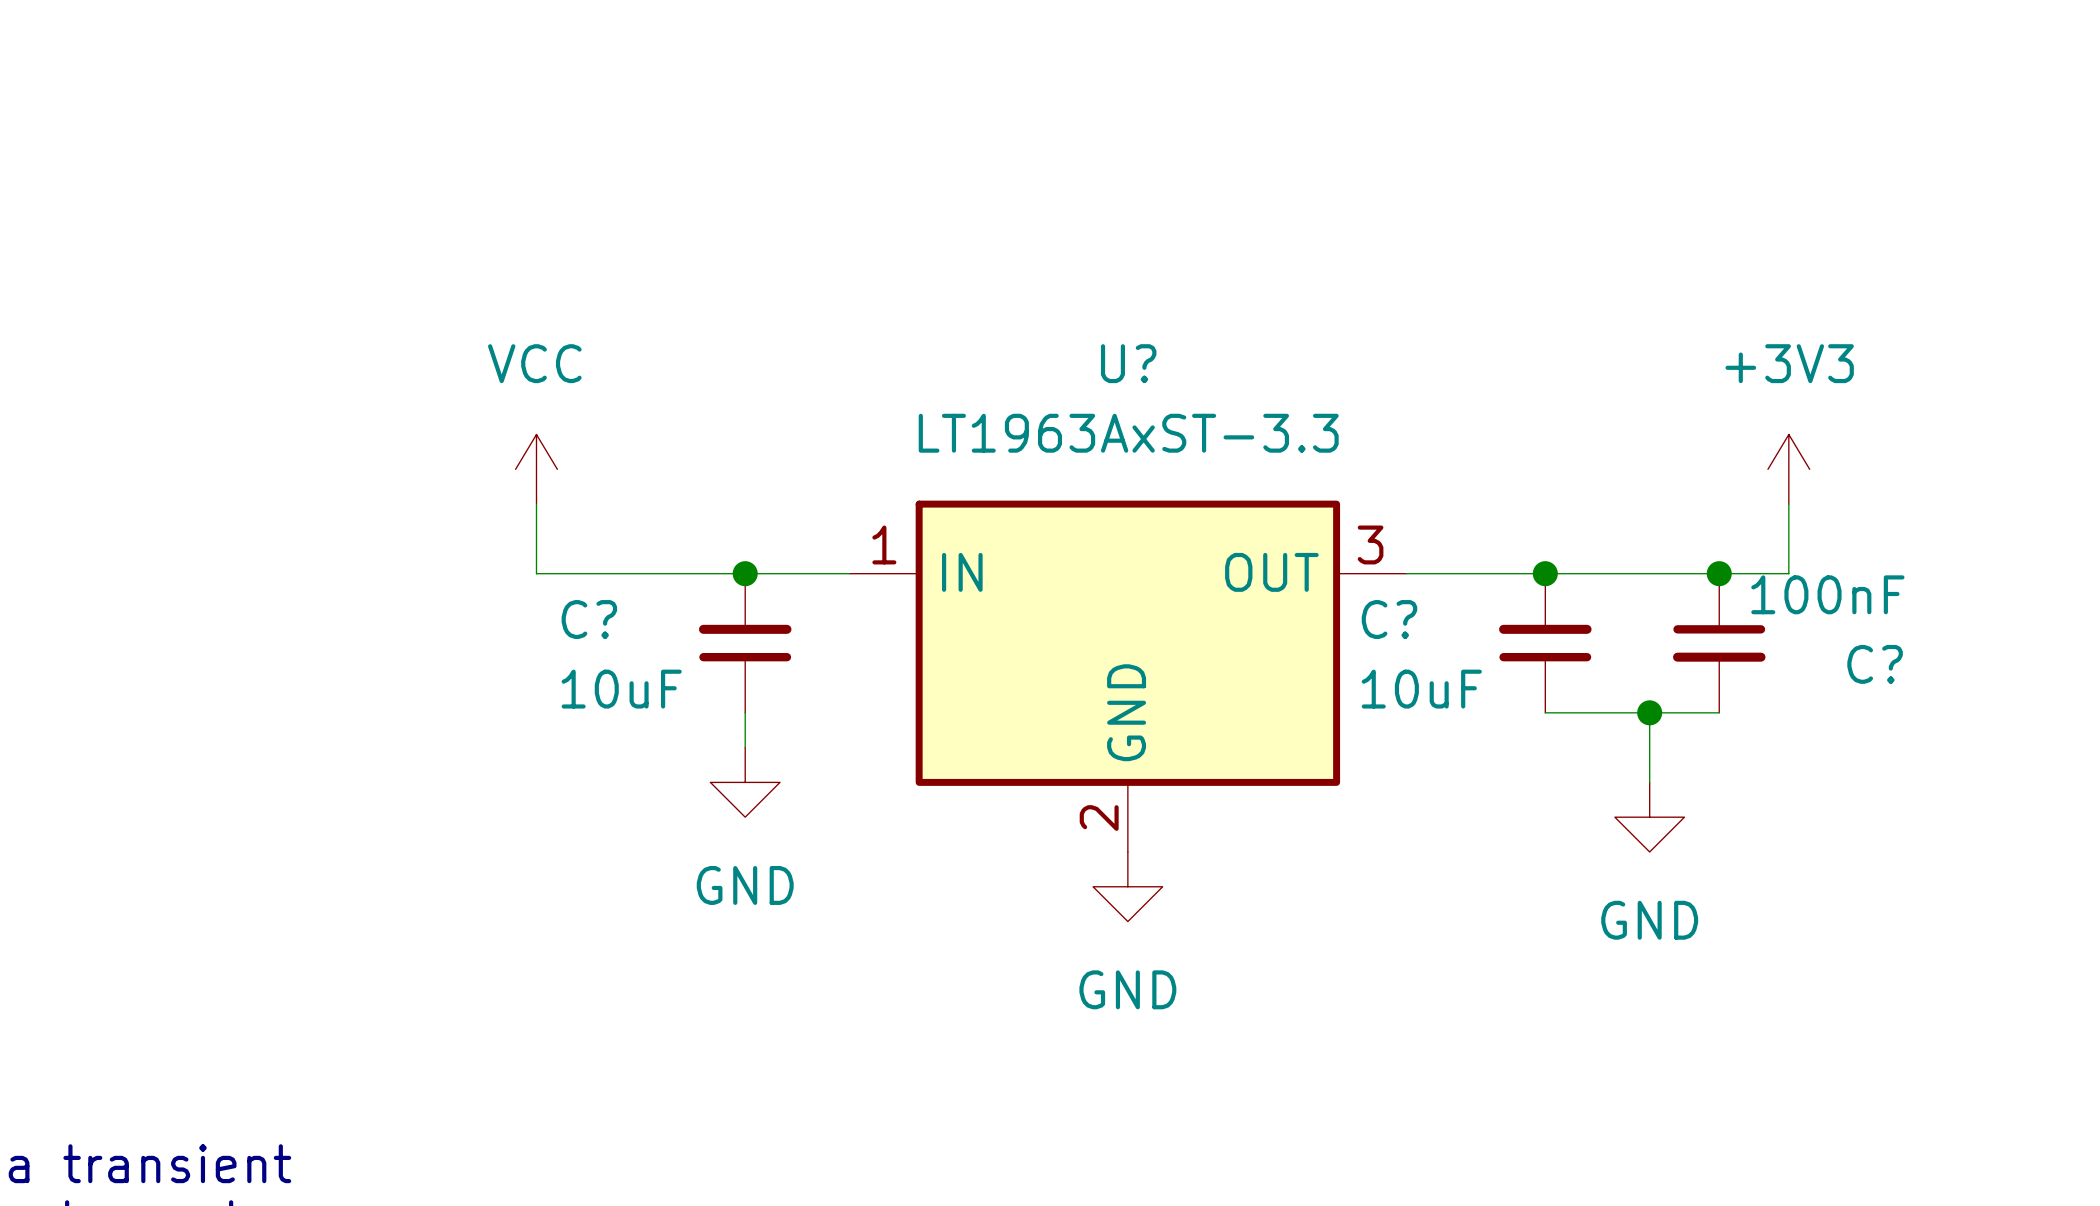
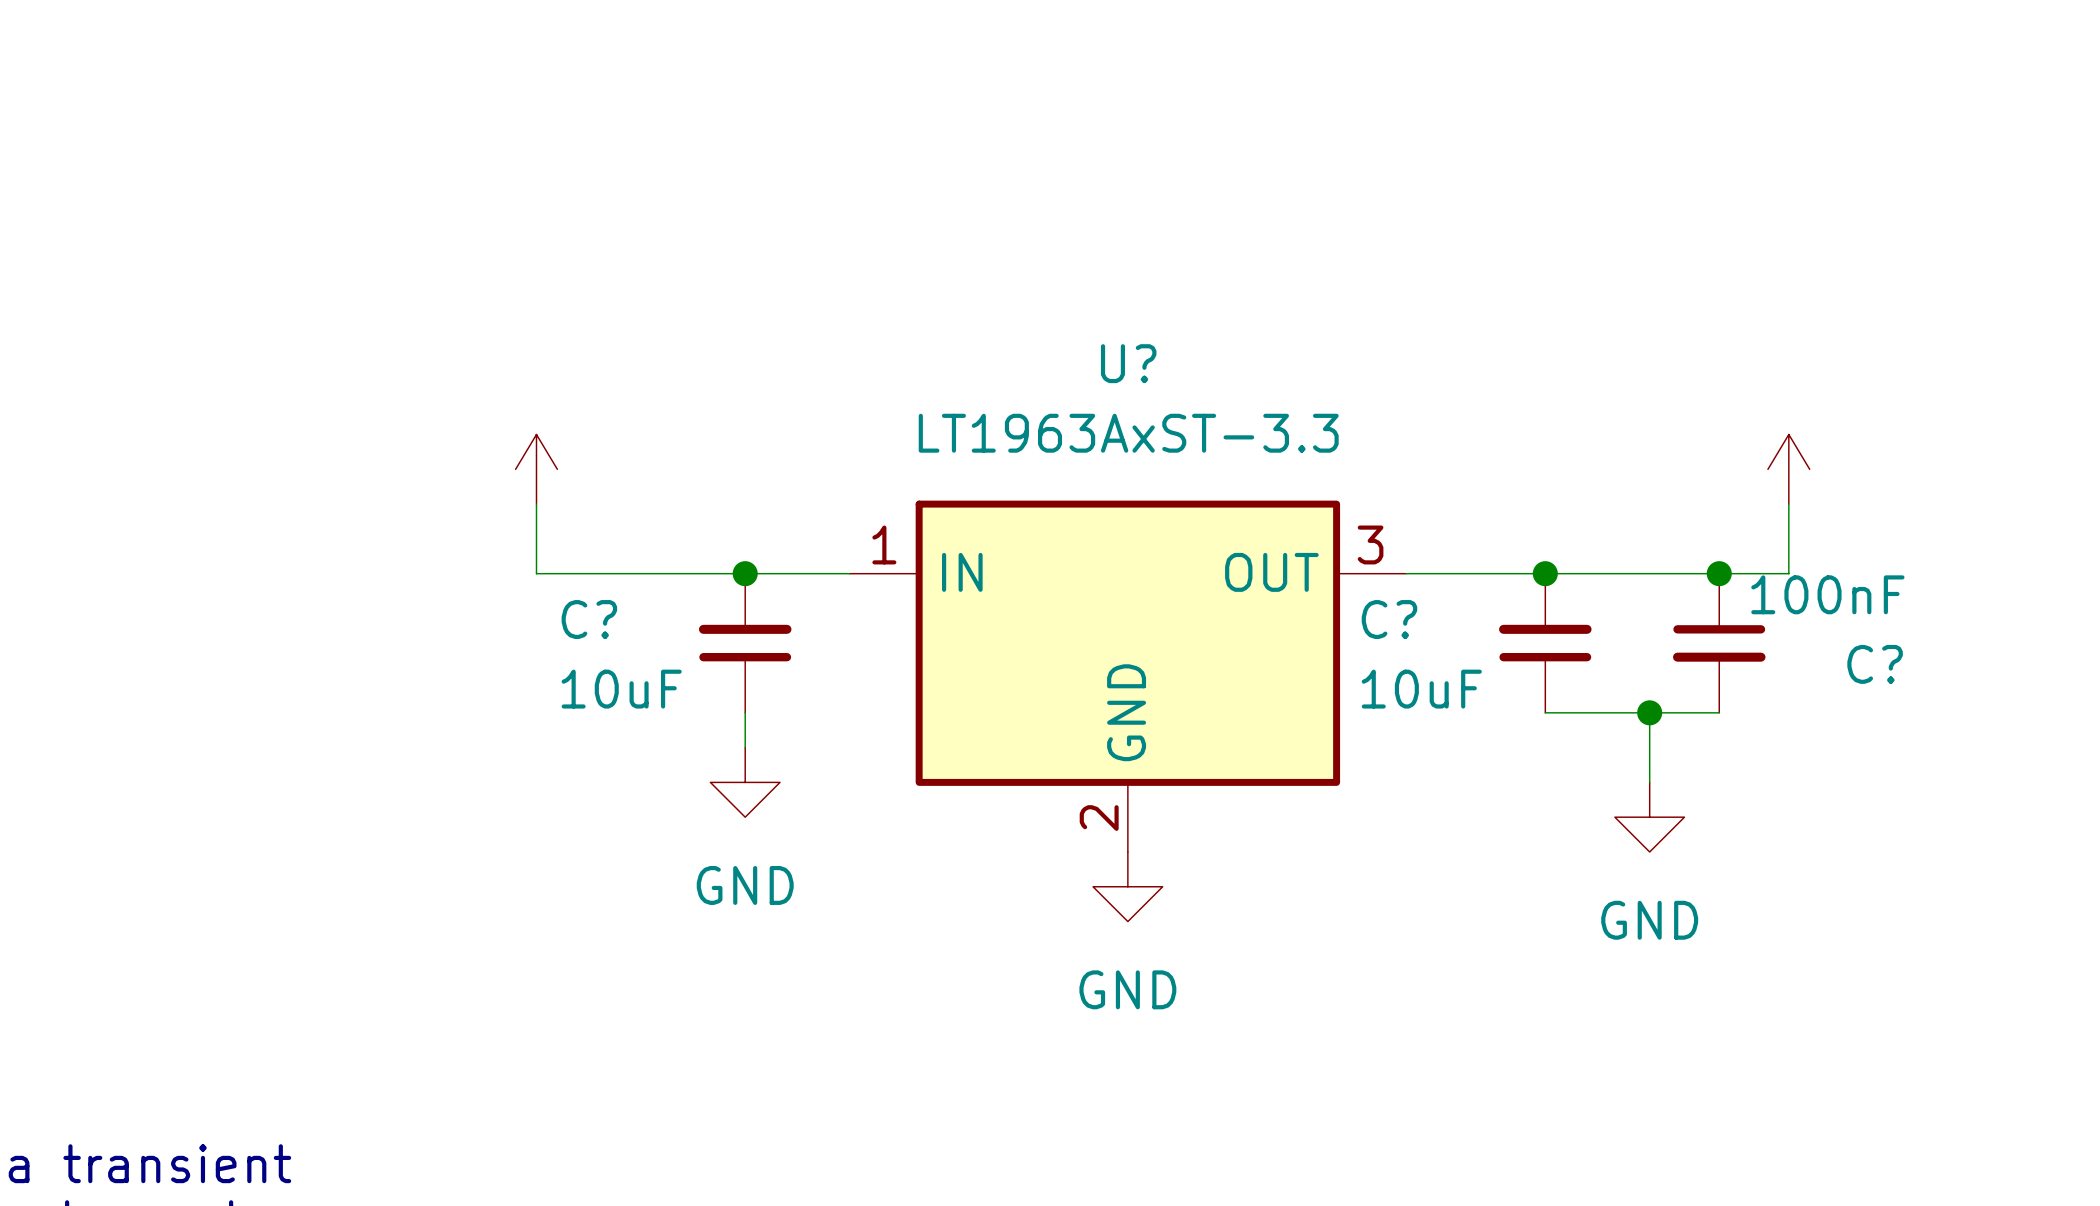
power symbol text: VCC (534, 363) -> none
power symbol text: +3V3 (1789, 363) -> none

